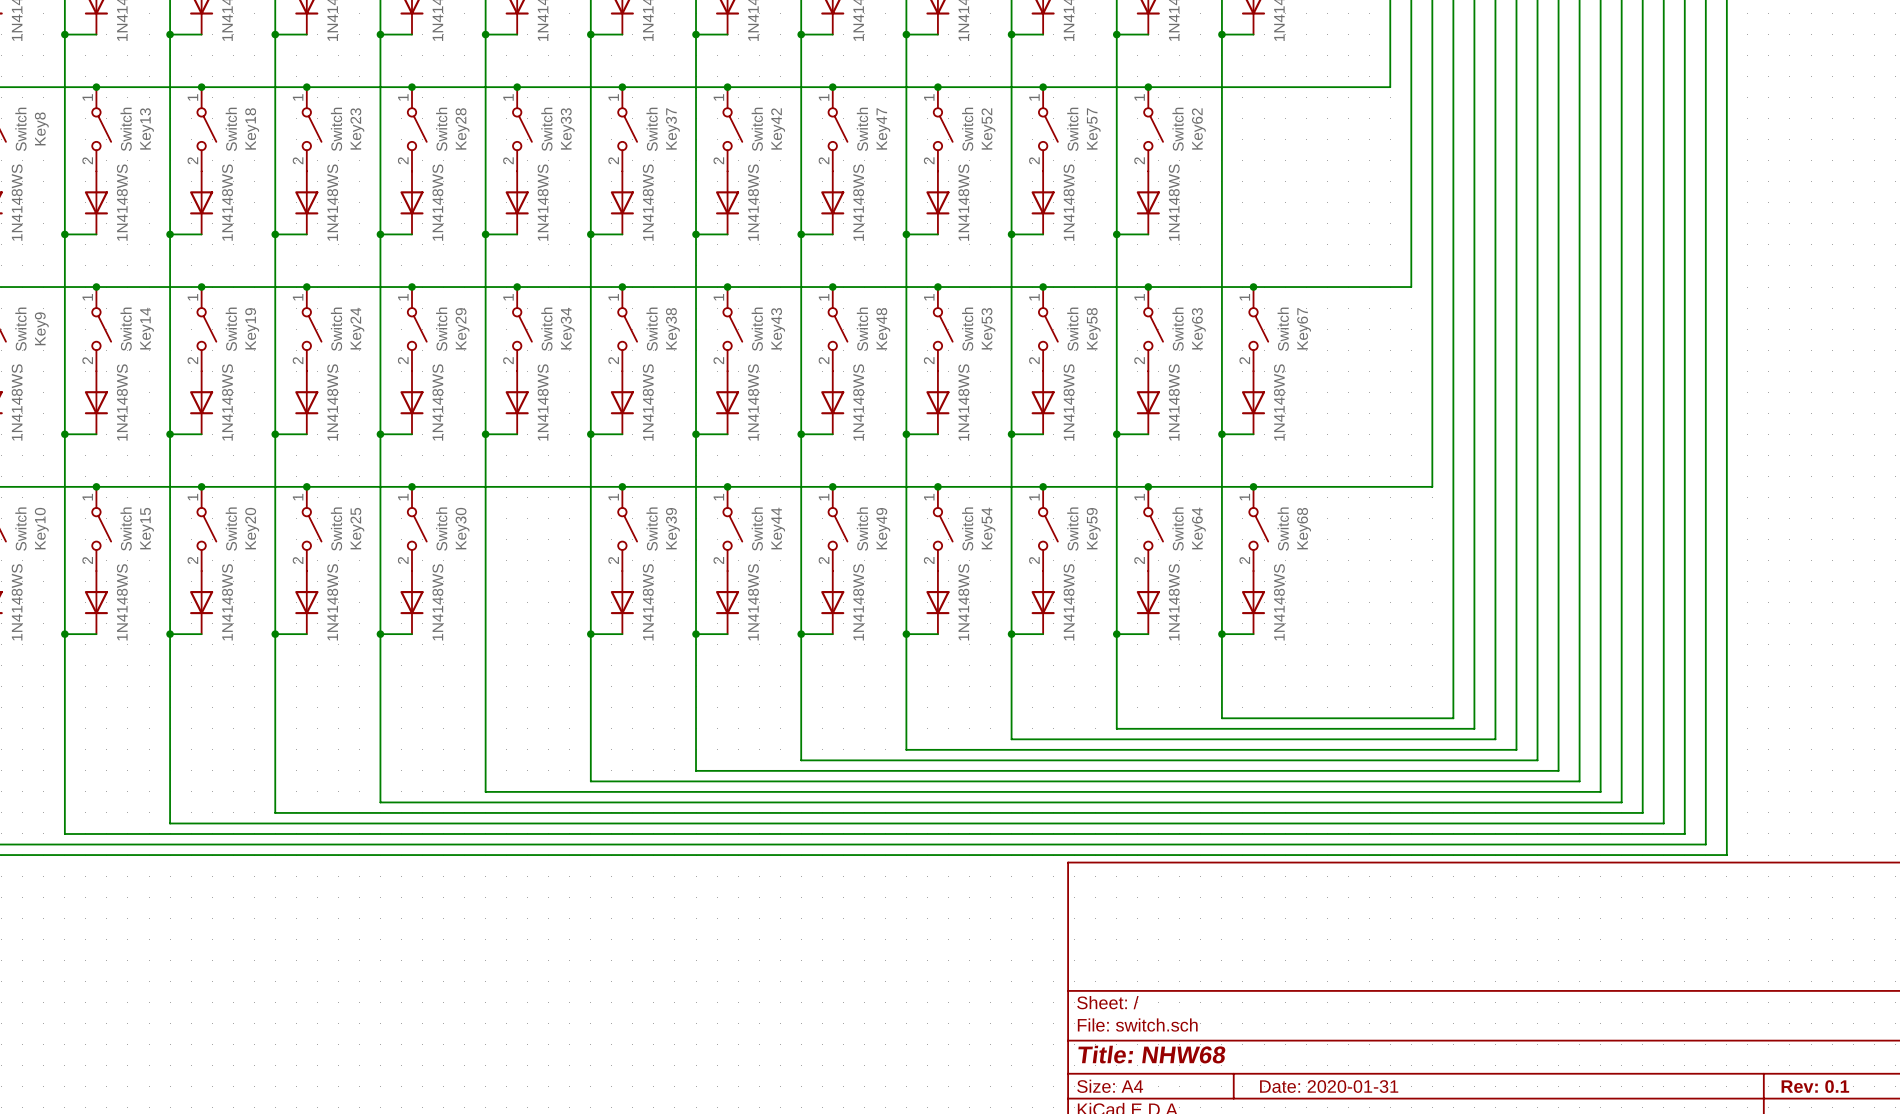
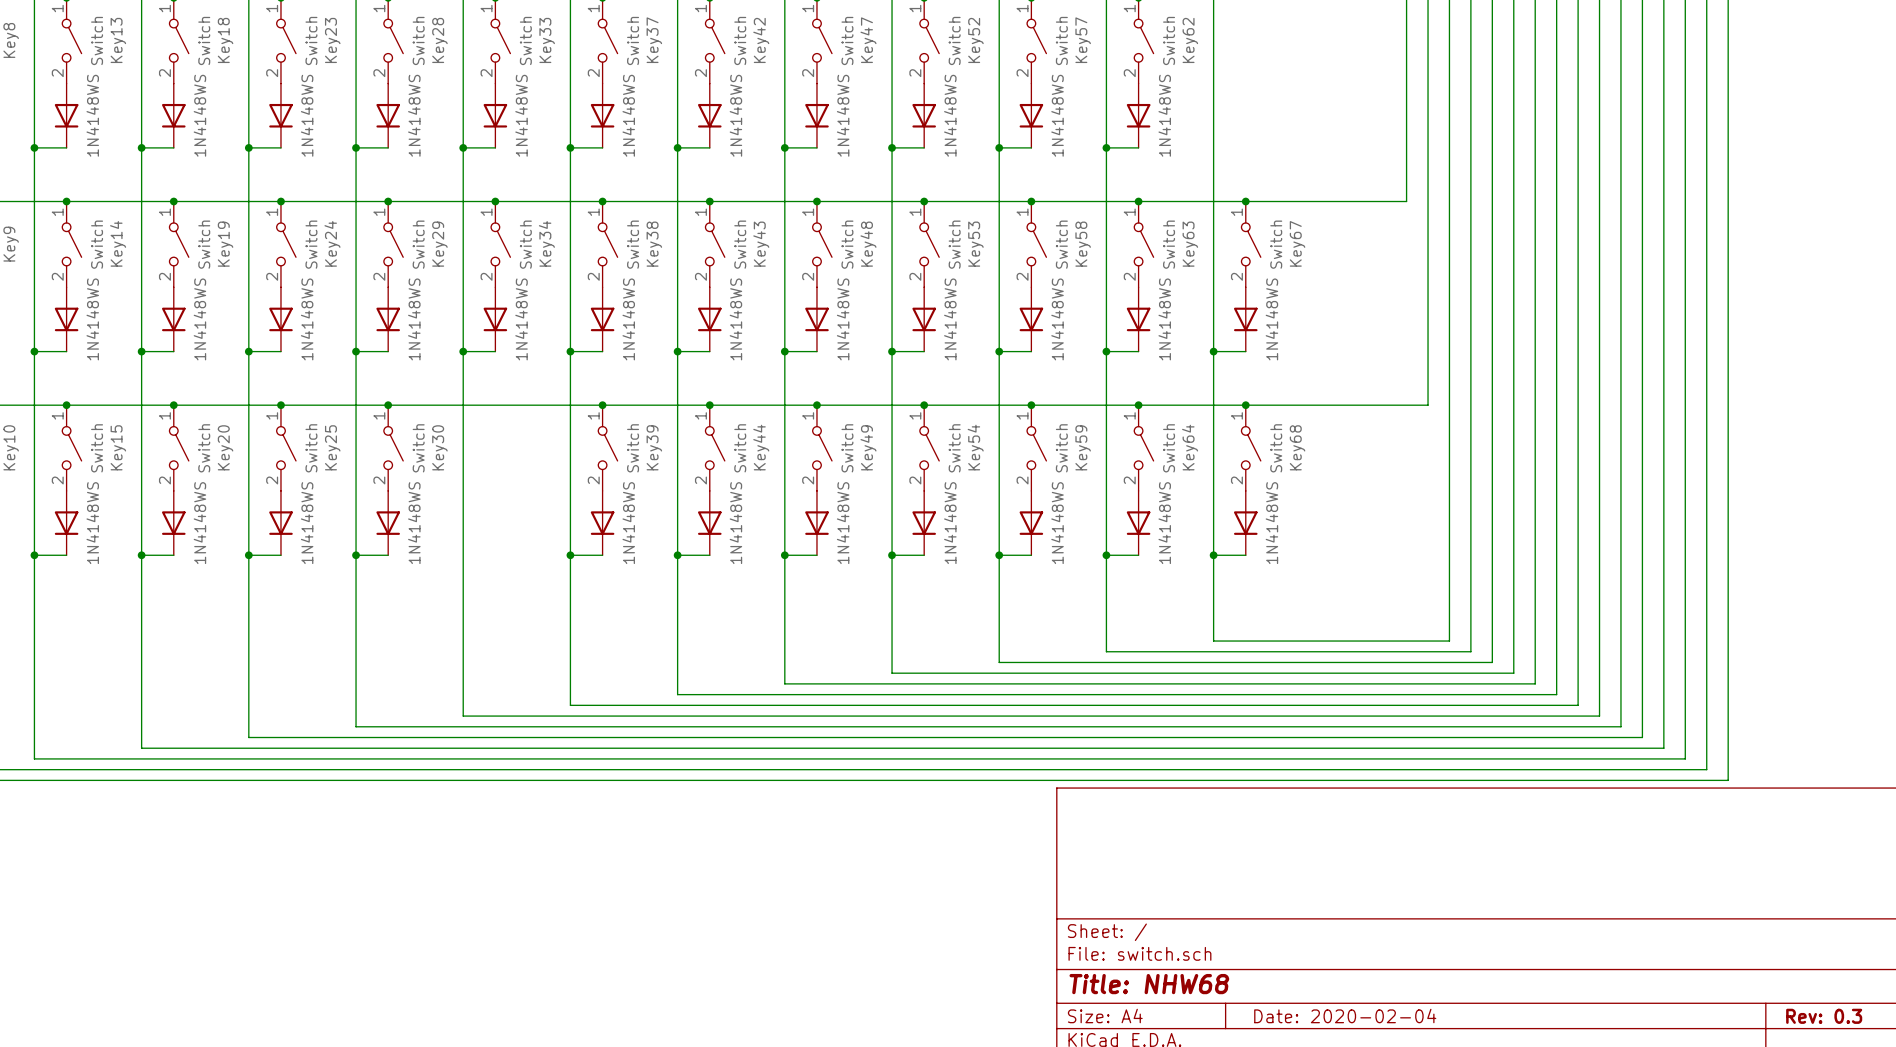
title block: Date: 2020-01-31 (1329, 1086) -> Date: 2020-02-04 (1345, 1016)
title block: Rev: 0.1 (1815, 1086) -> Rev: 0.3 (1824, 1016)

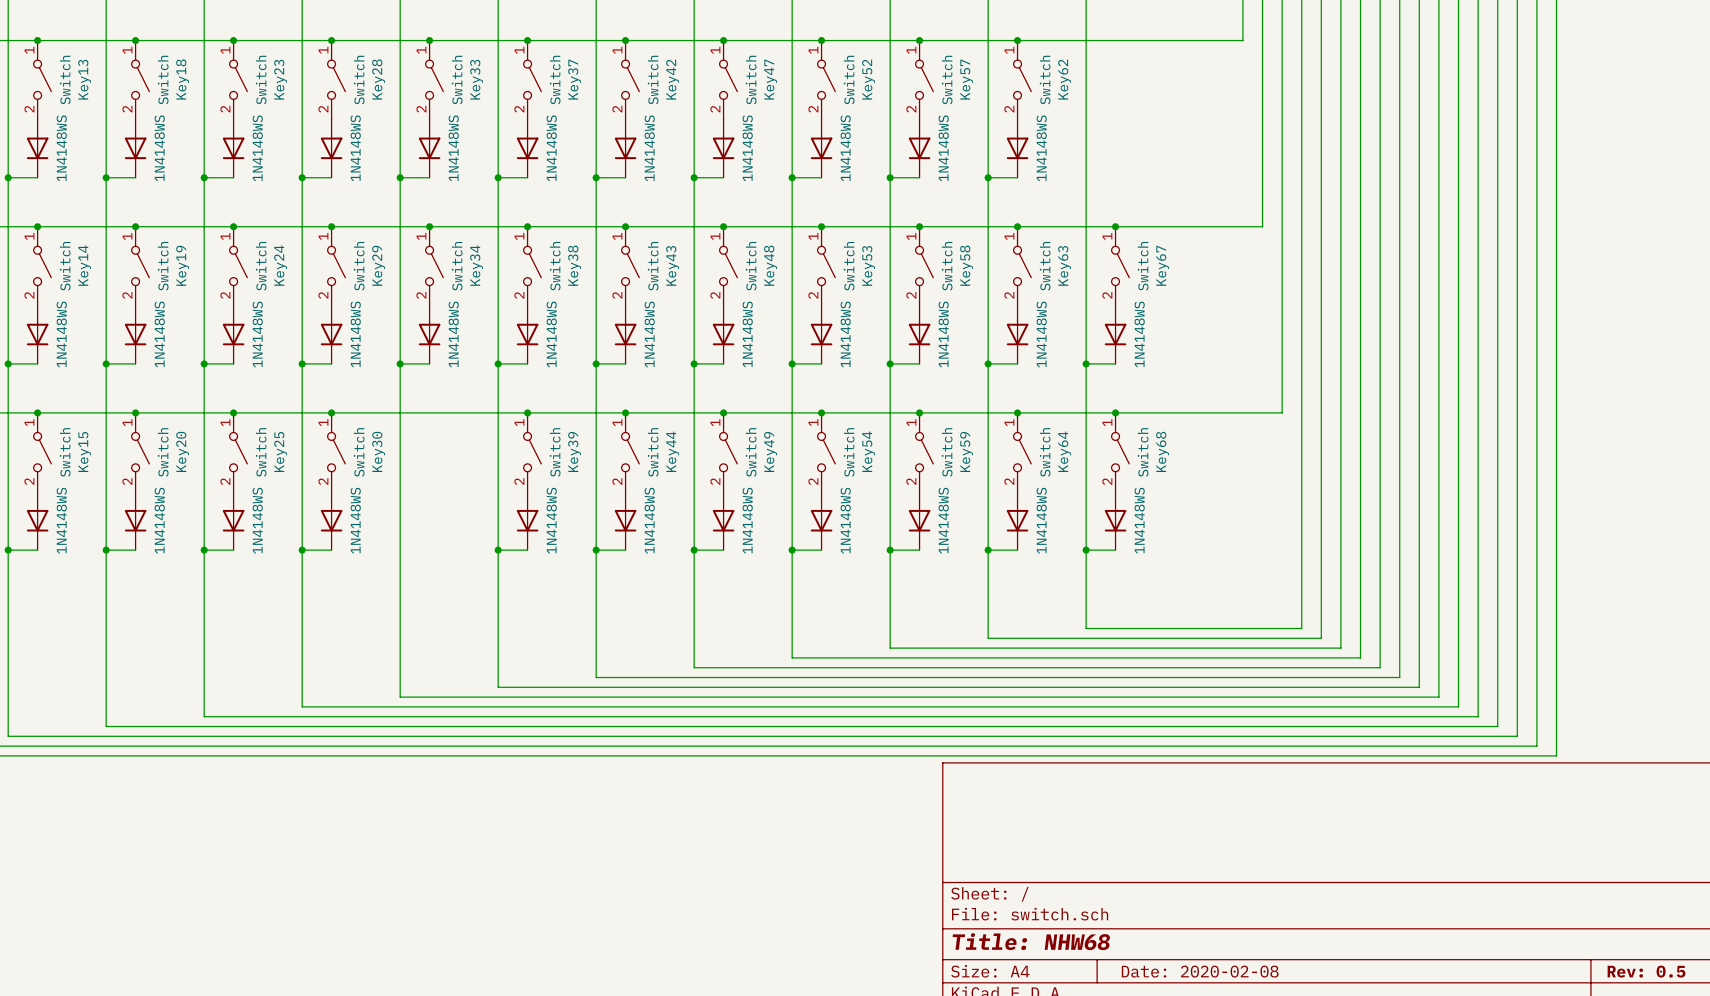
title block: Date: 2020-02-04 (1345, 1016) -> Date: 2020-02-08 (1200, 971)
title block: Rev: 0.3 (1824, 1016) -> Rev: 0.5 (1646, 971)

